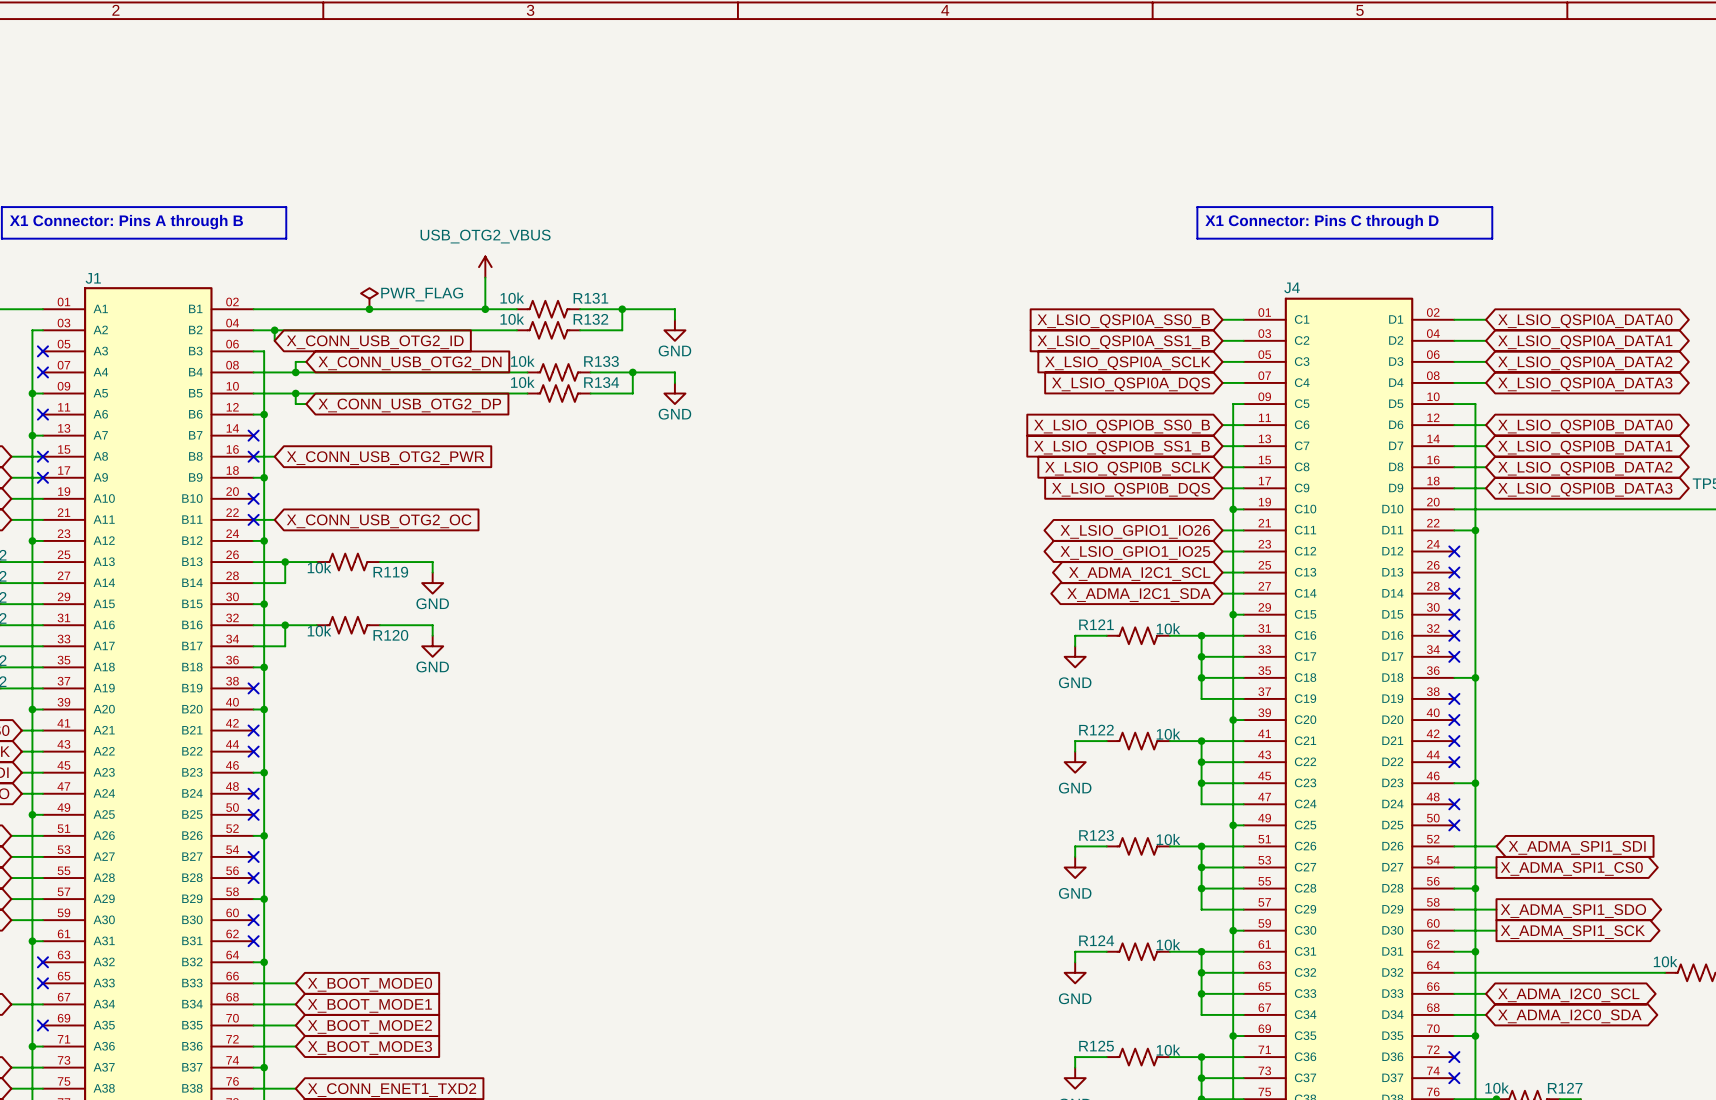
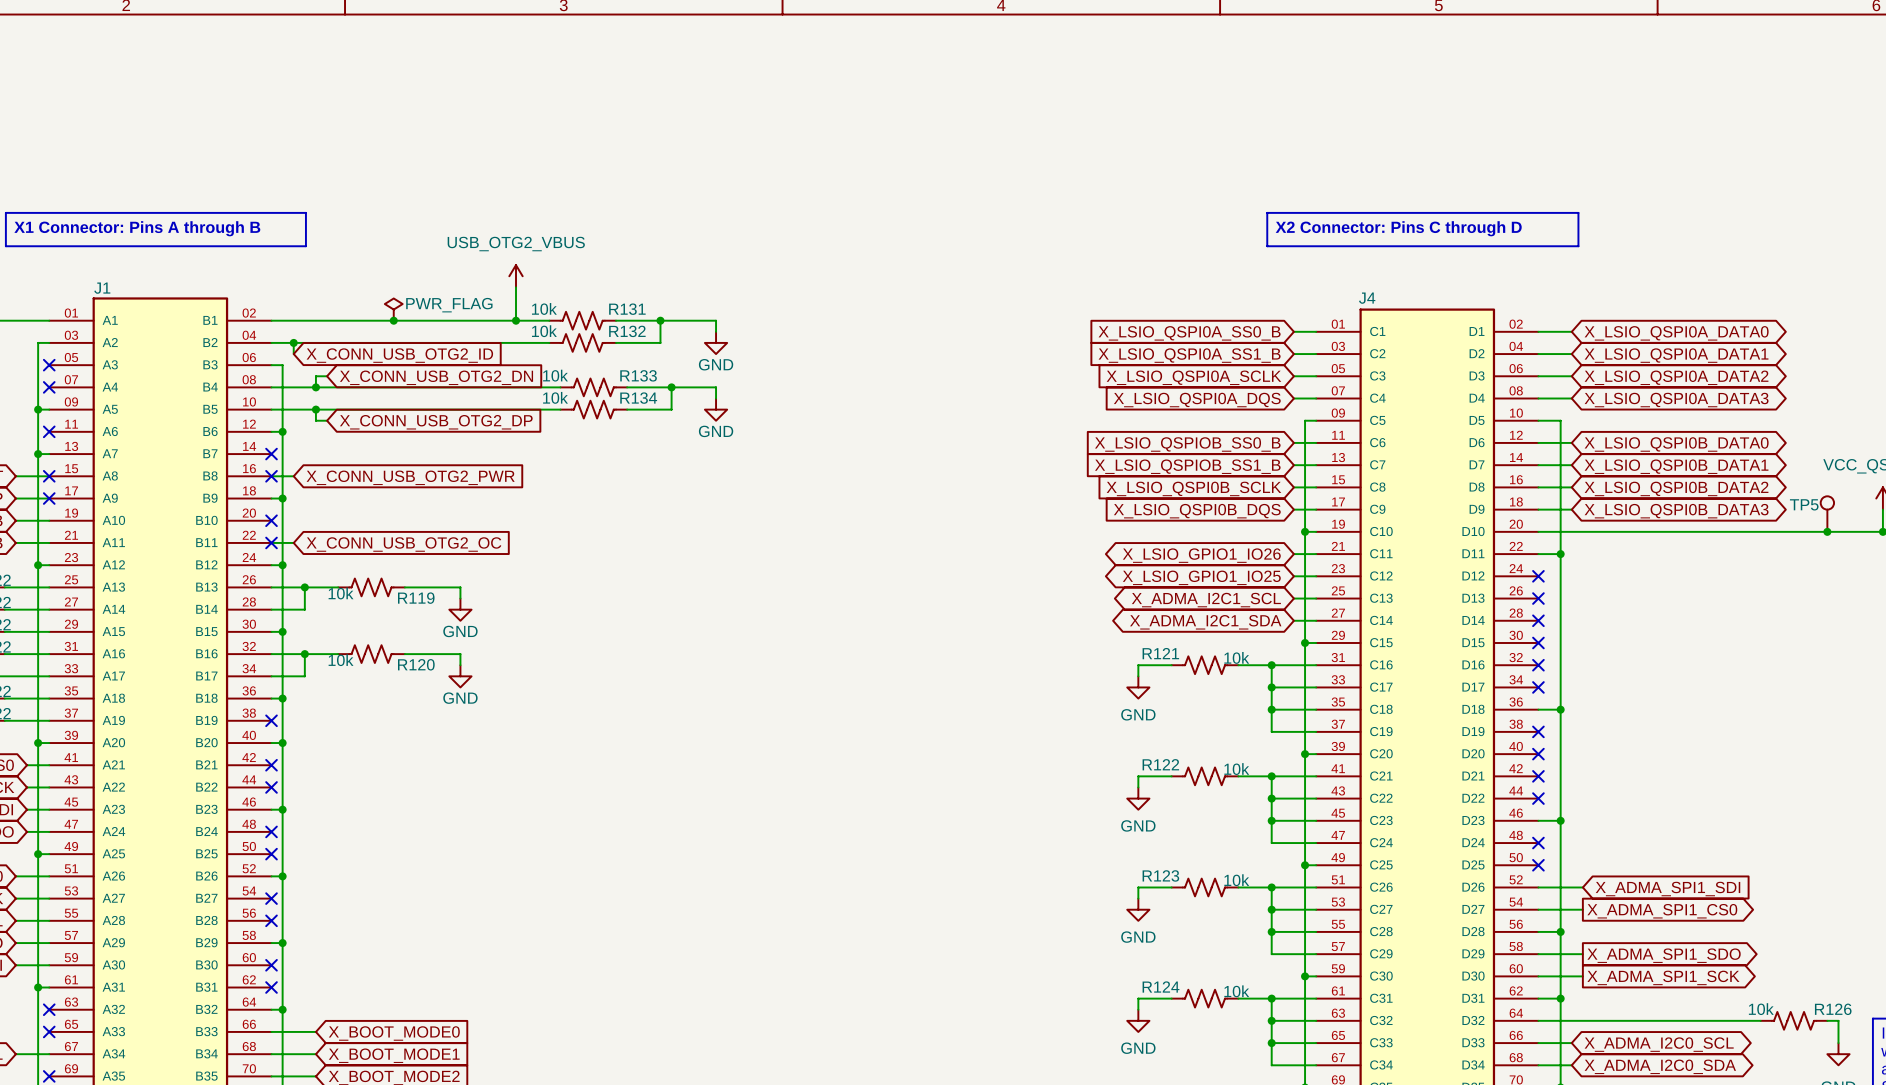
text: X1 Connector: Pins C through D (1321, 222) -> X2 Connector: Pins C through D (1398, 228)

